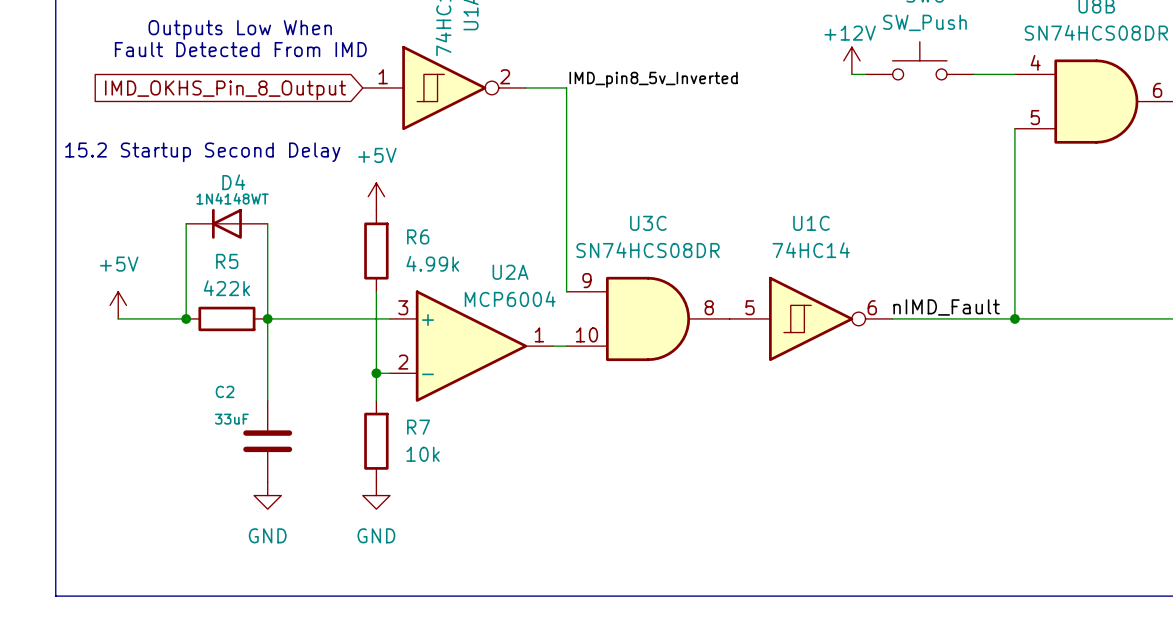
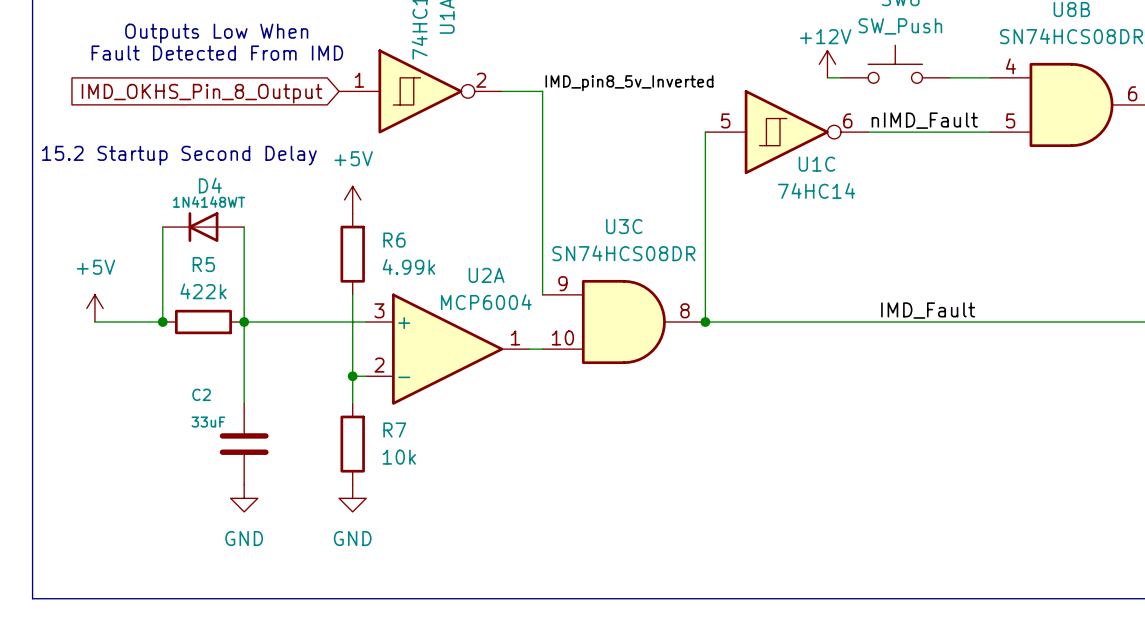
label: none -> nIMD_Fault (924, 120)
wire: none -> (705, 132) (705, 322) (868, 322)
wire: (1014, 128) (1014, 318) -> (990, 132) (868, 132)
U1C name position: U1C (811, 223) -> U1C (816, 164)
U1C value position: 74HC14 (811, 250) -> 74HC14 (816, 190)
label: nIMD_Fault (946, 307) -> IMD_Fault (928, 310)
junction: none -> (705, 322)
U1C position: (811, 318) -> (786, 132)
junction: (1014, 318) -> none

